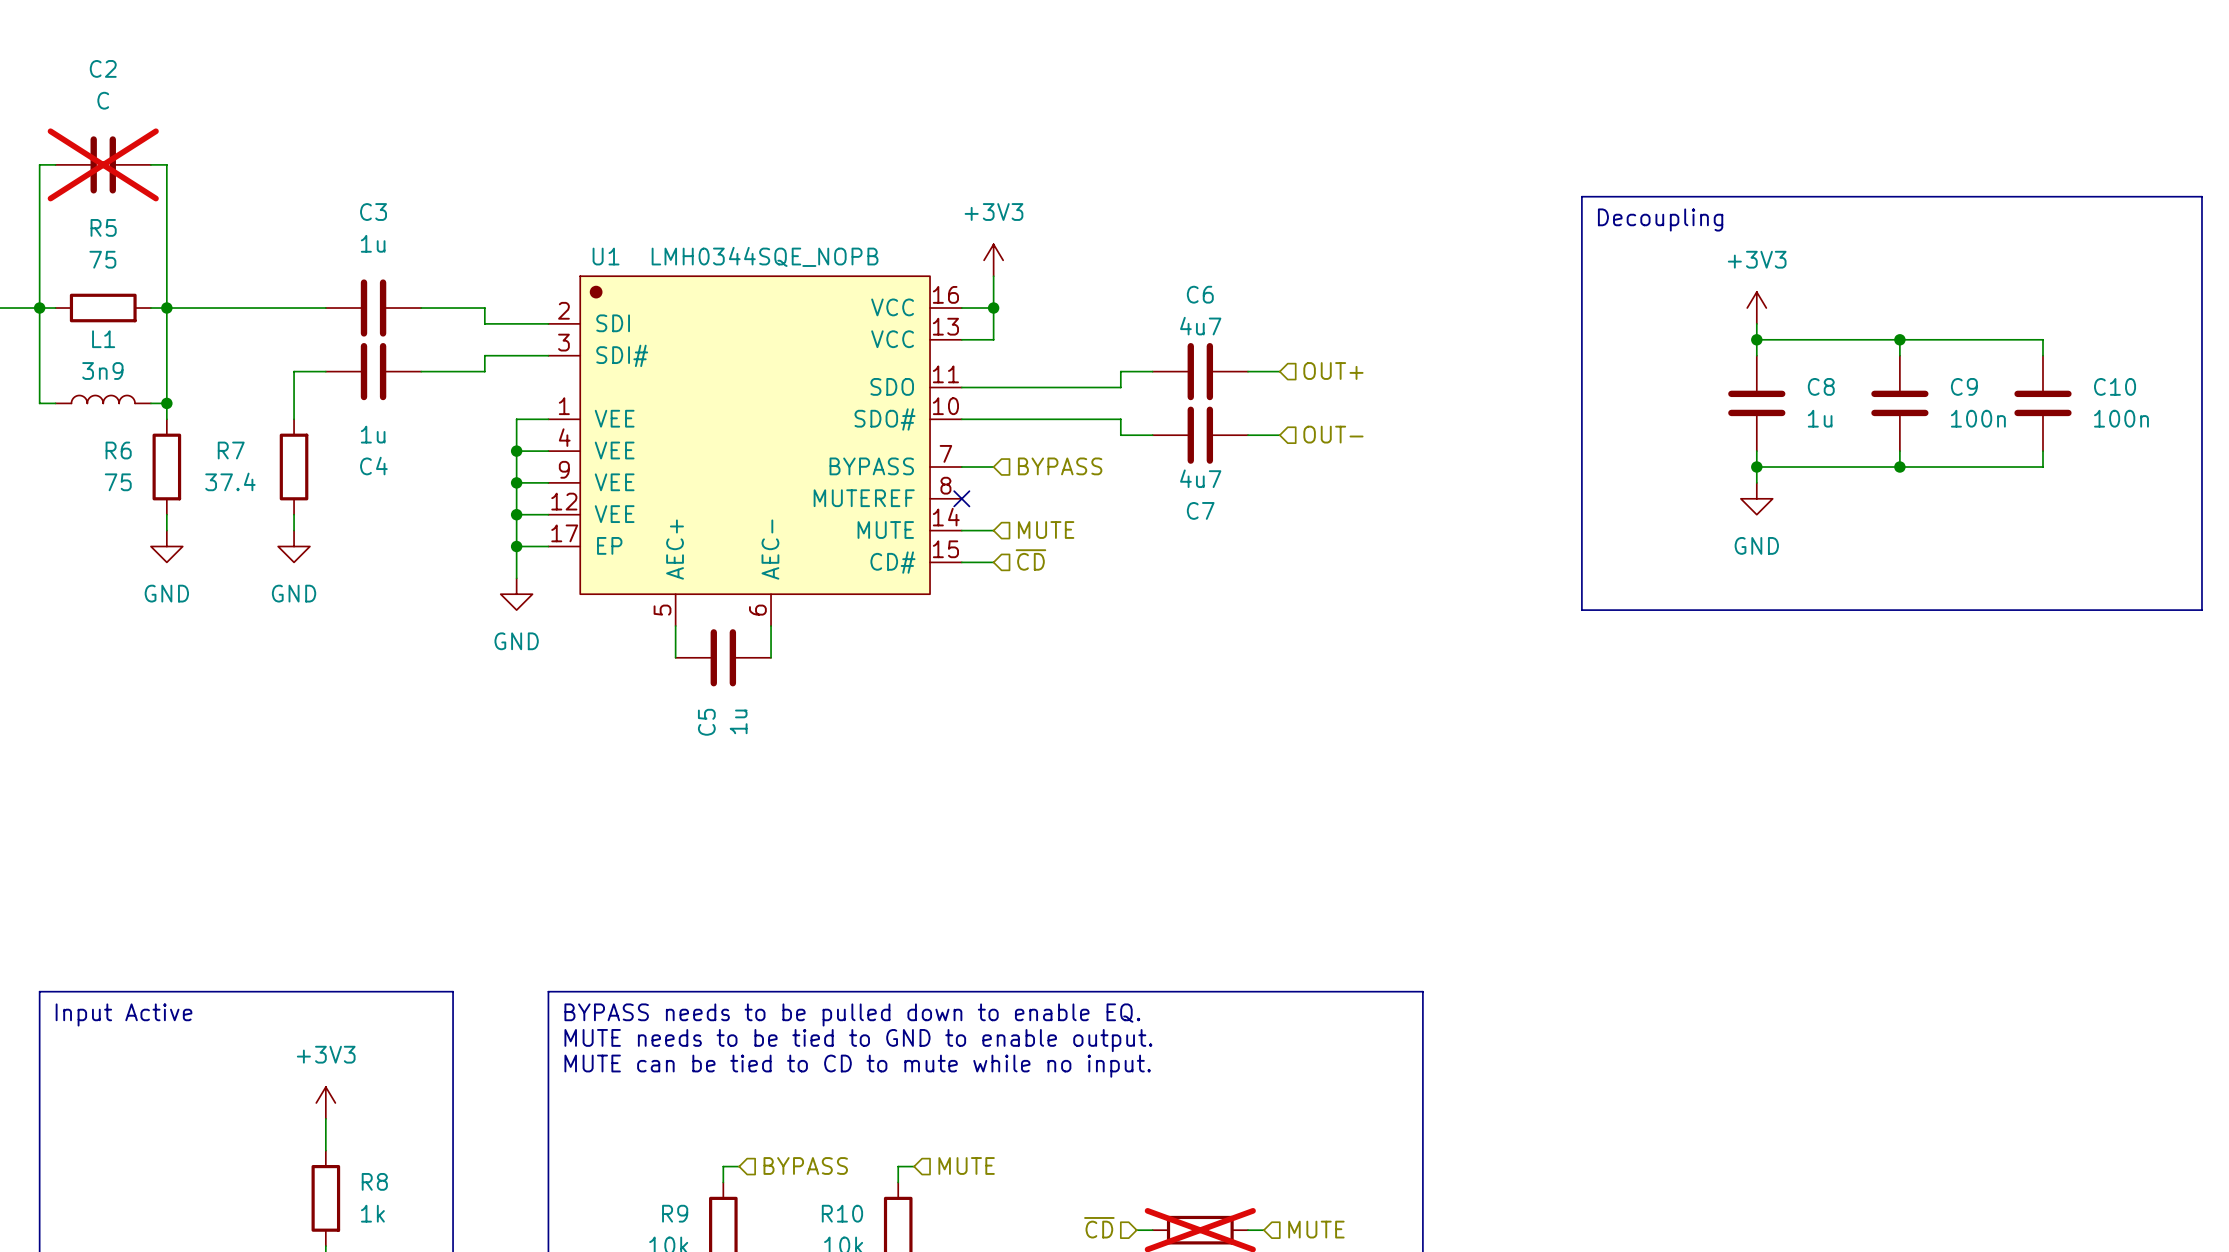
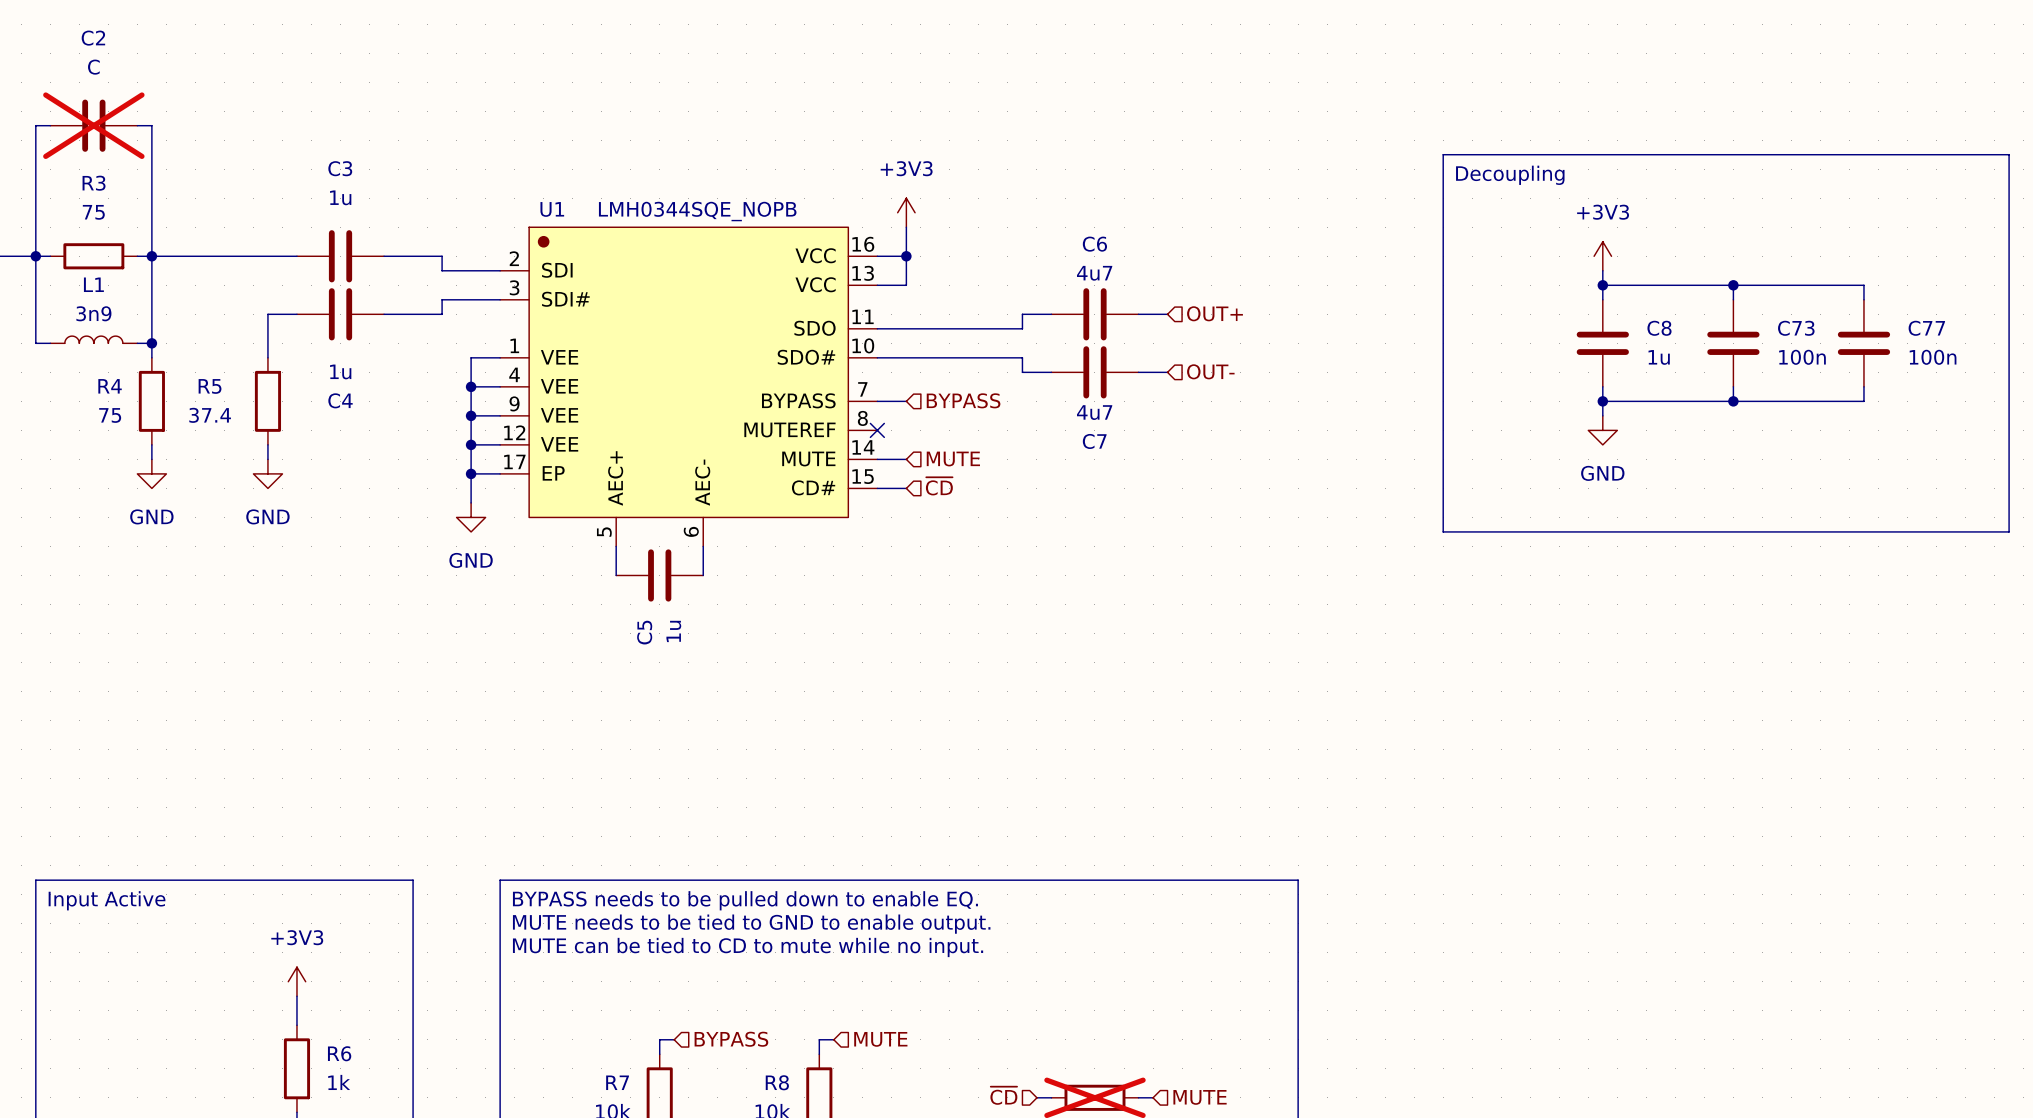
R5 name: R5 (103, 227) -> R3 (94, 183)
C9 name: C9 (1964, 386) -> C73 (1796, 328)
C10 name: C10 (2115, 386) -> C77 (1926, 328)
R6 name: R6 (118, 450) -> R4 (110, 386)
R7 name: R7 (231, 450) -> R5 (210, 386)
R8 name: R8 (374, 1181) -> R6 (339, 1053)
R9 name: R9 (675, 1213) -> R7 (617, 1082)
R10 name: R10 (842, 1213) -> R8 (777, 1082)

